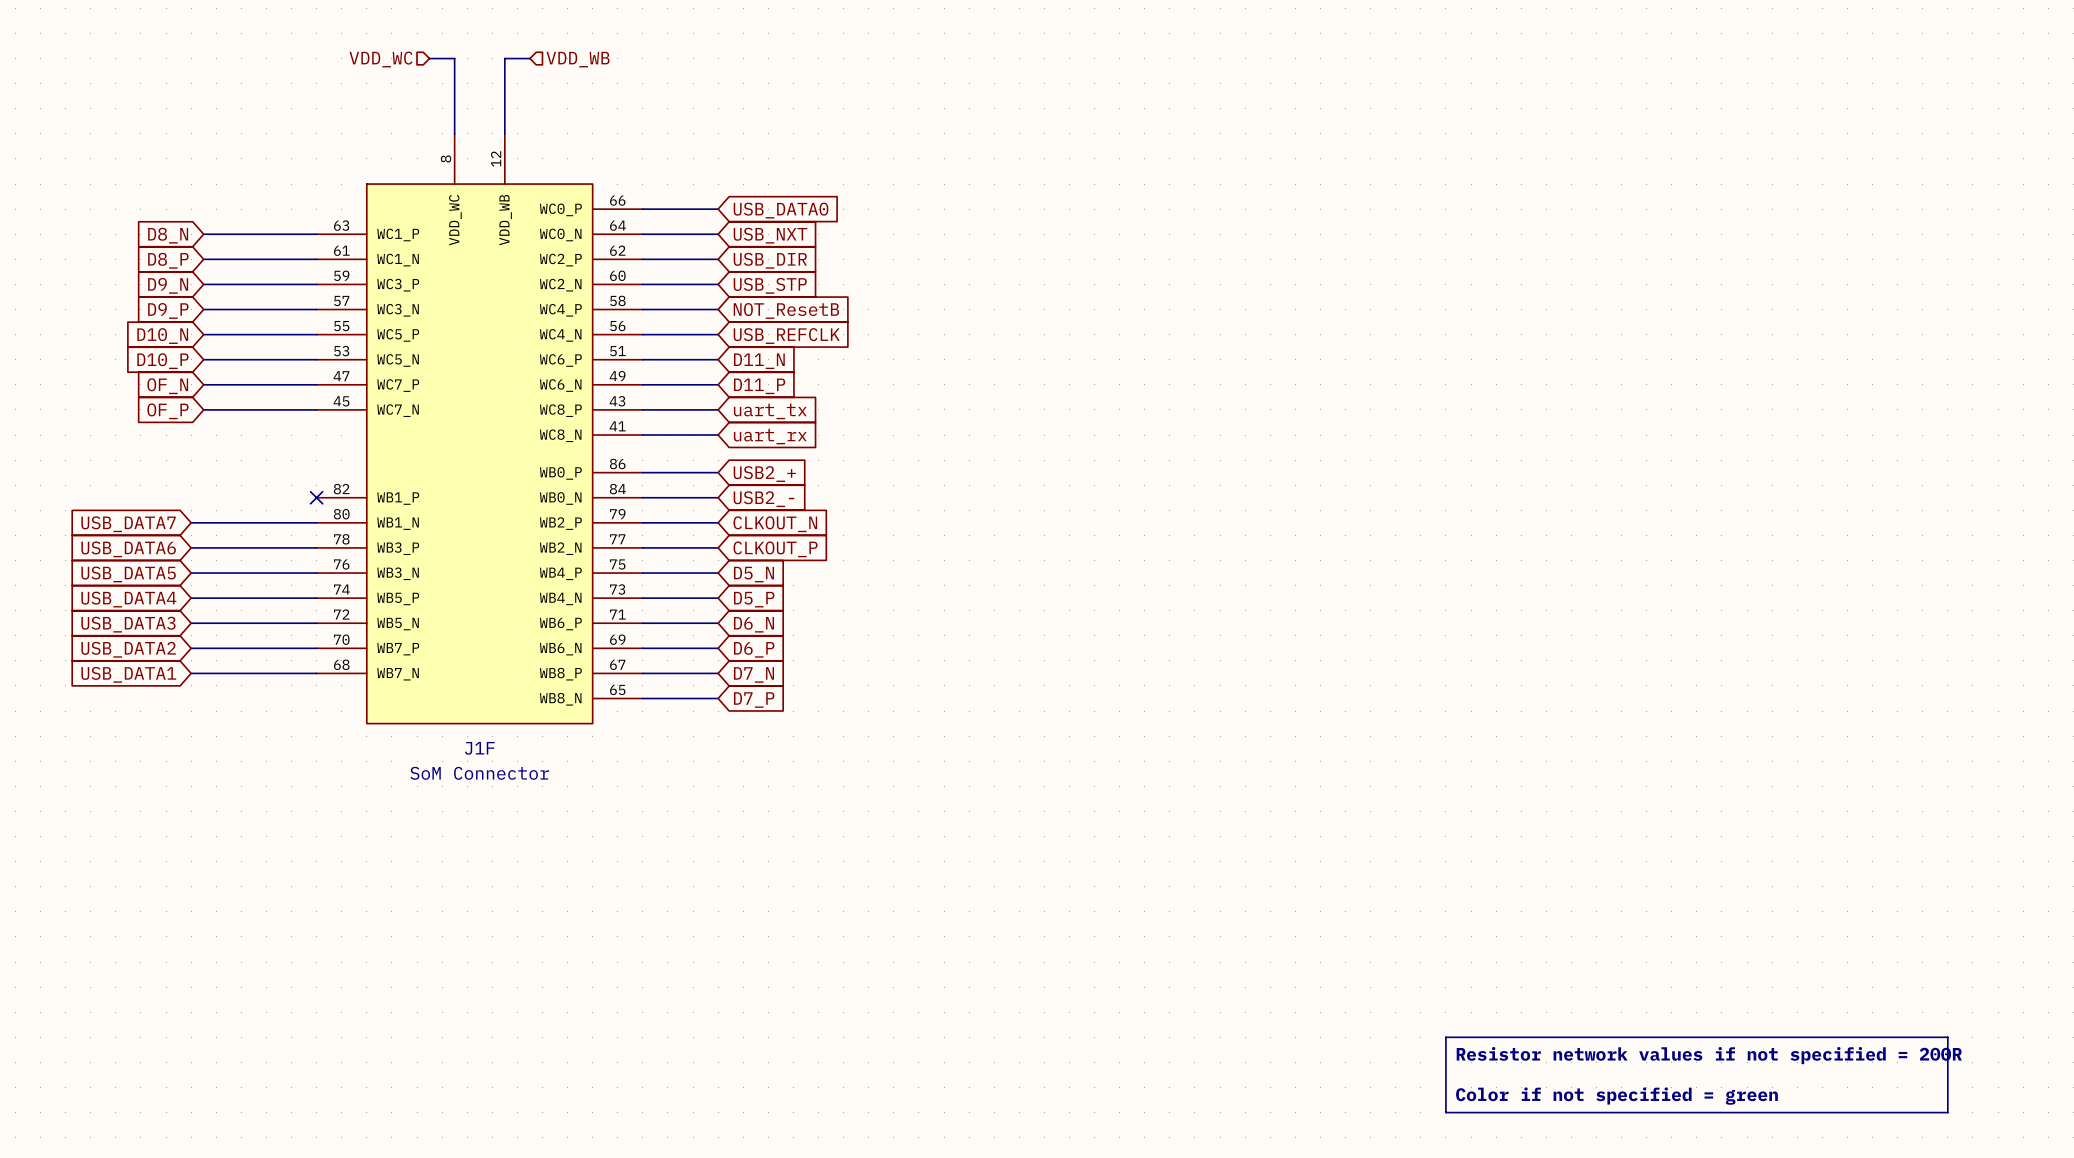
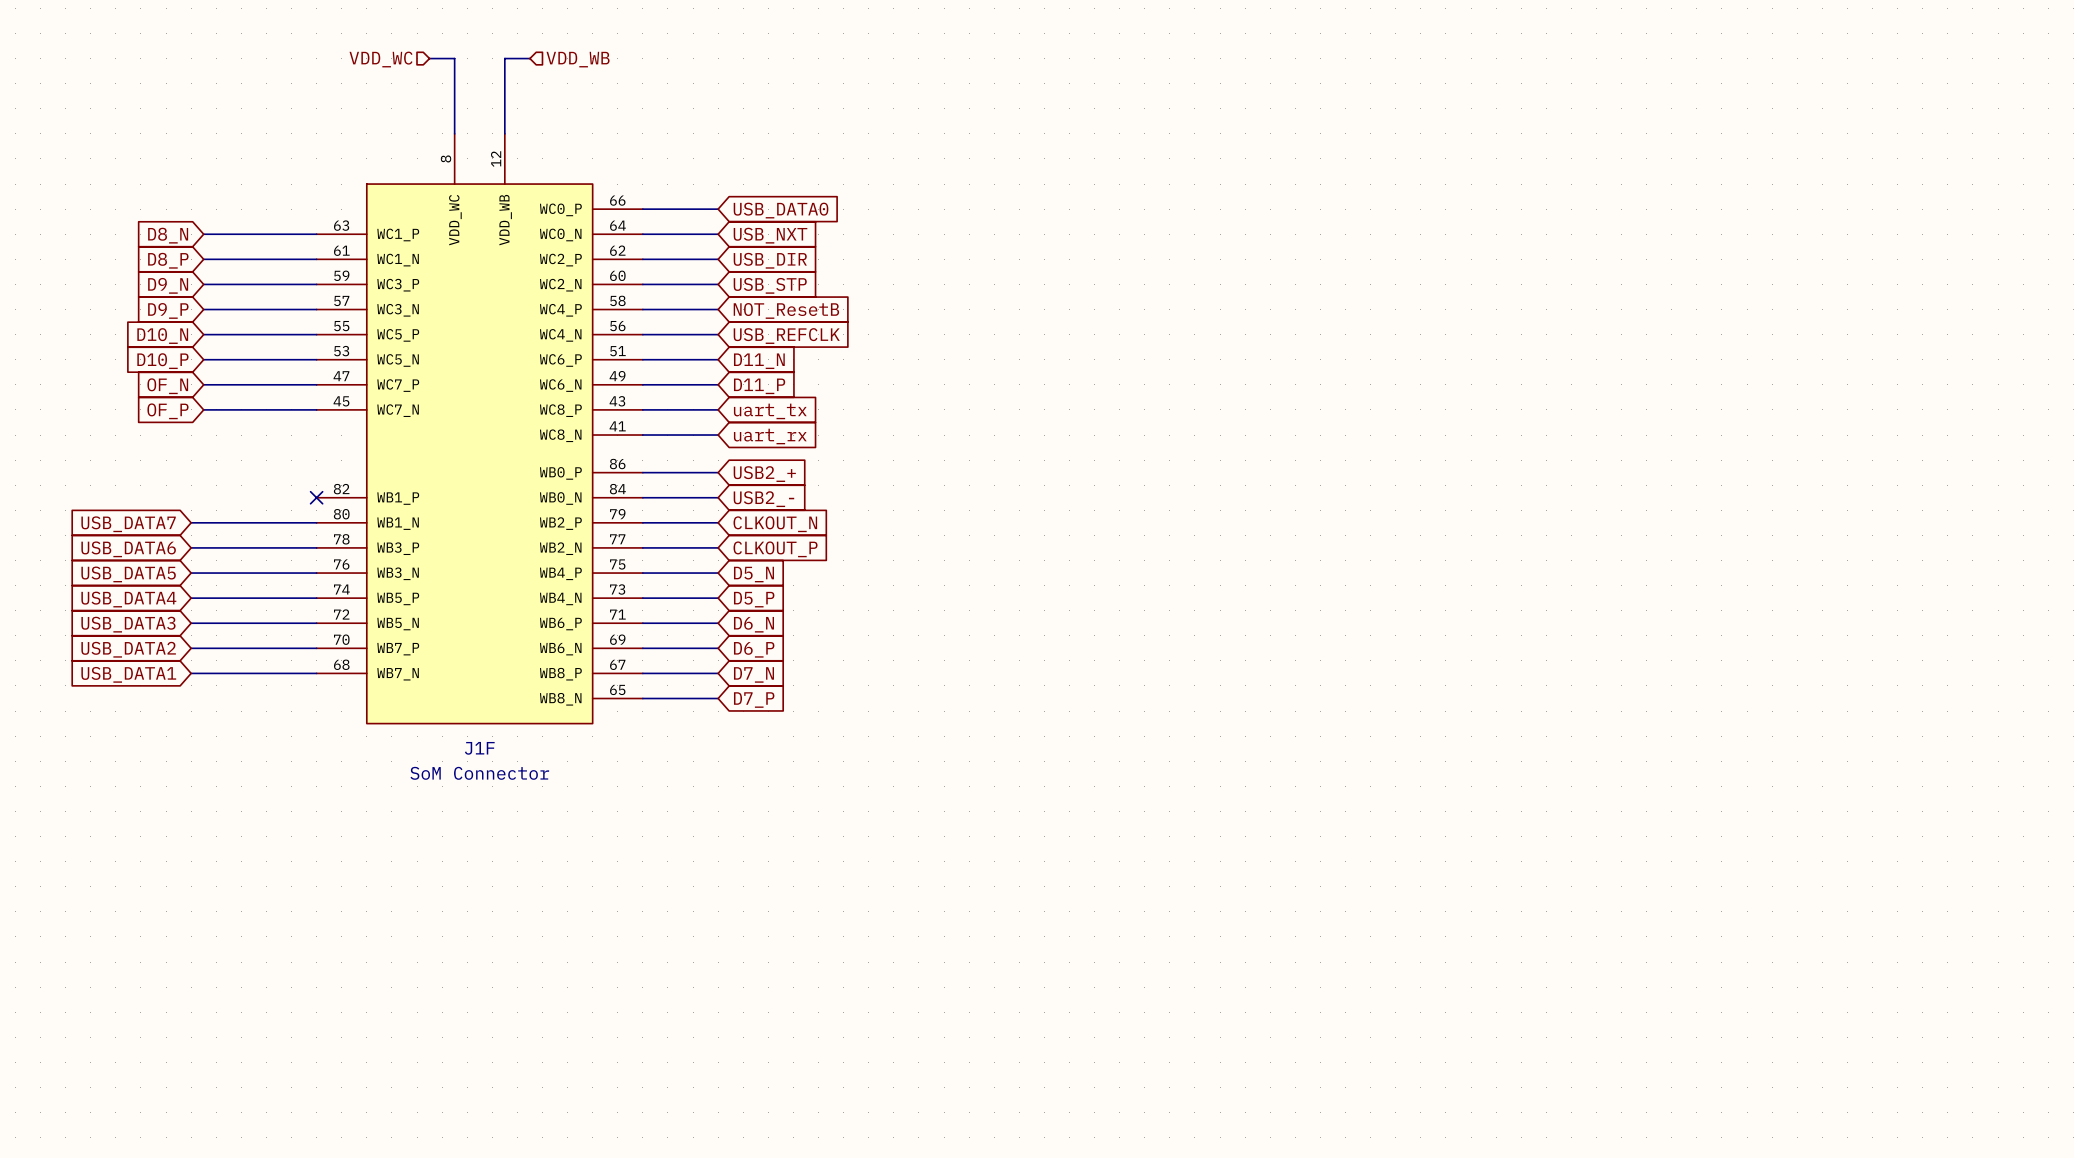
line: (1445, 1037) (1947, 1037) (1947, 1112) (1445, 1112) (1445, 1037) -> none
text: Resistor network values if not specified = 200R (1709, 1055) -> none
text: Color if not specified = green (1616, 1096) -> none

